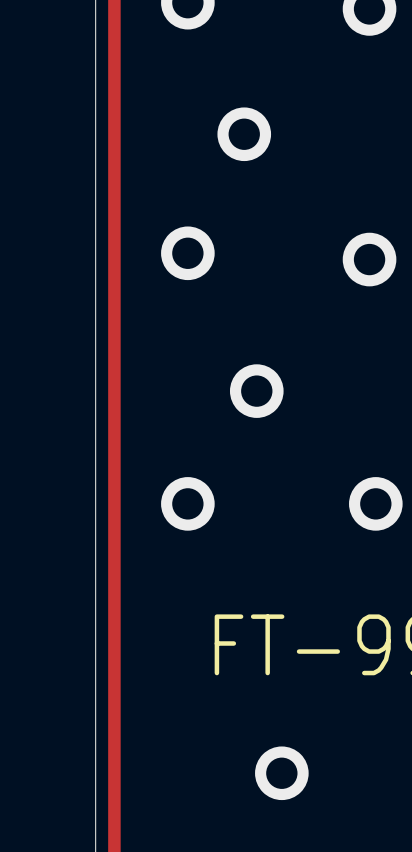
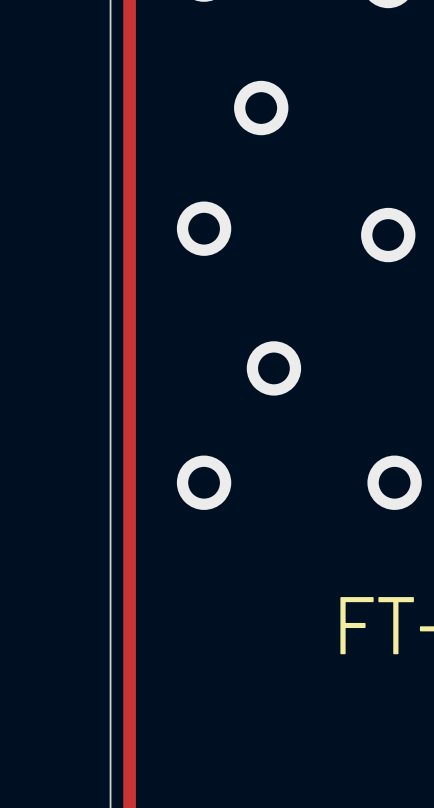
via: (281, 773) -> none

